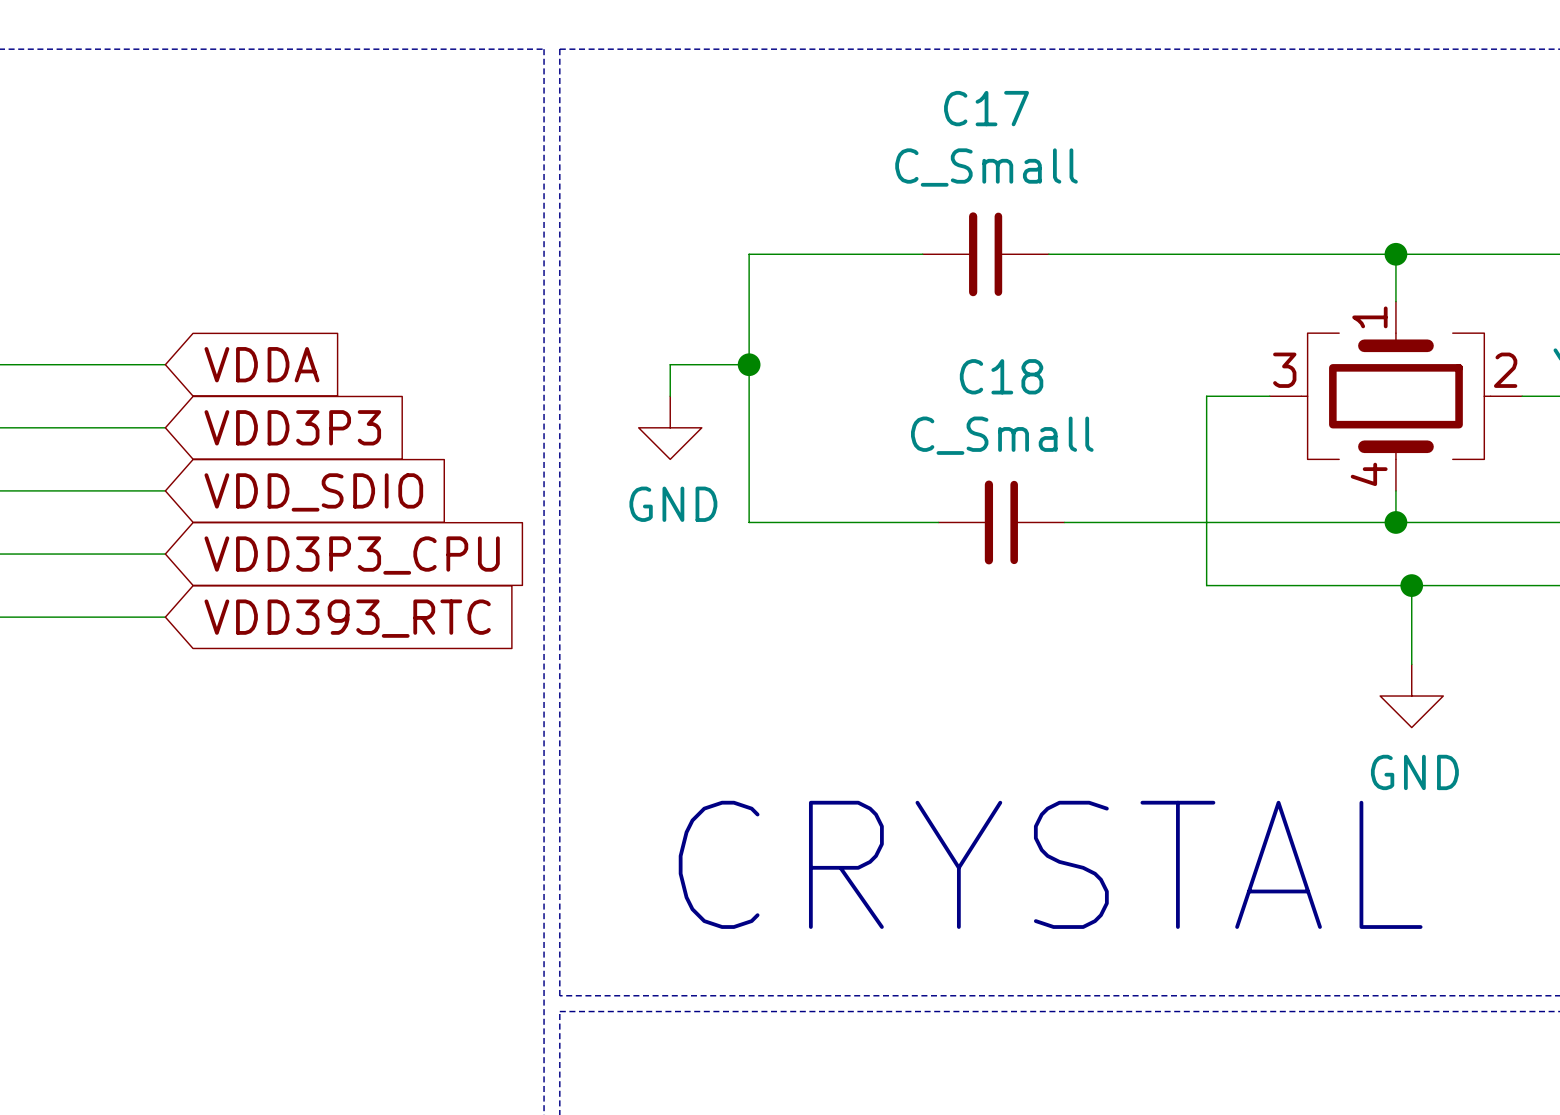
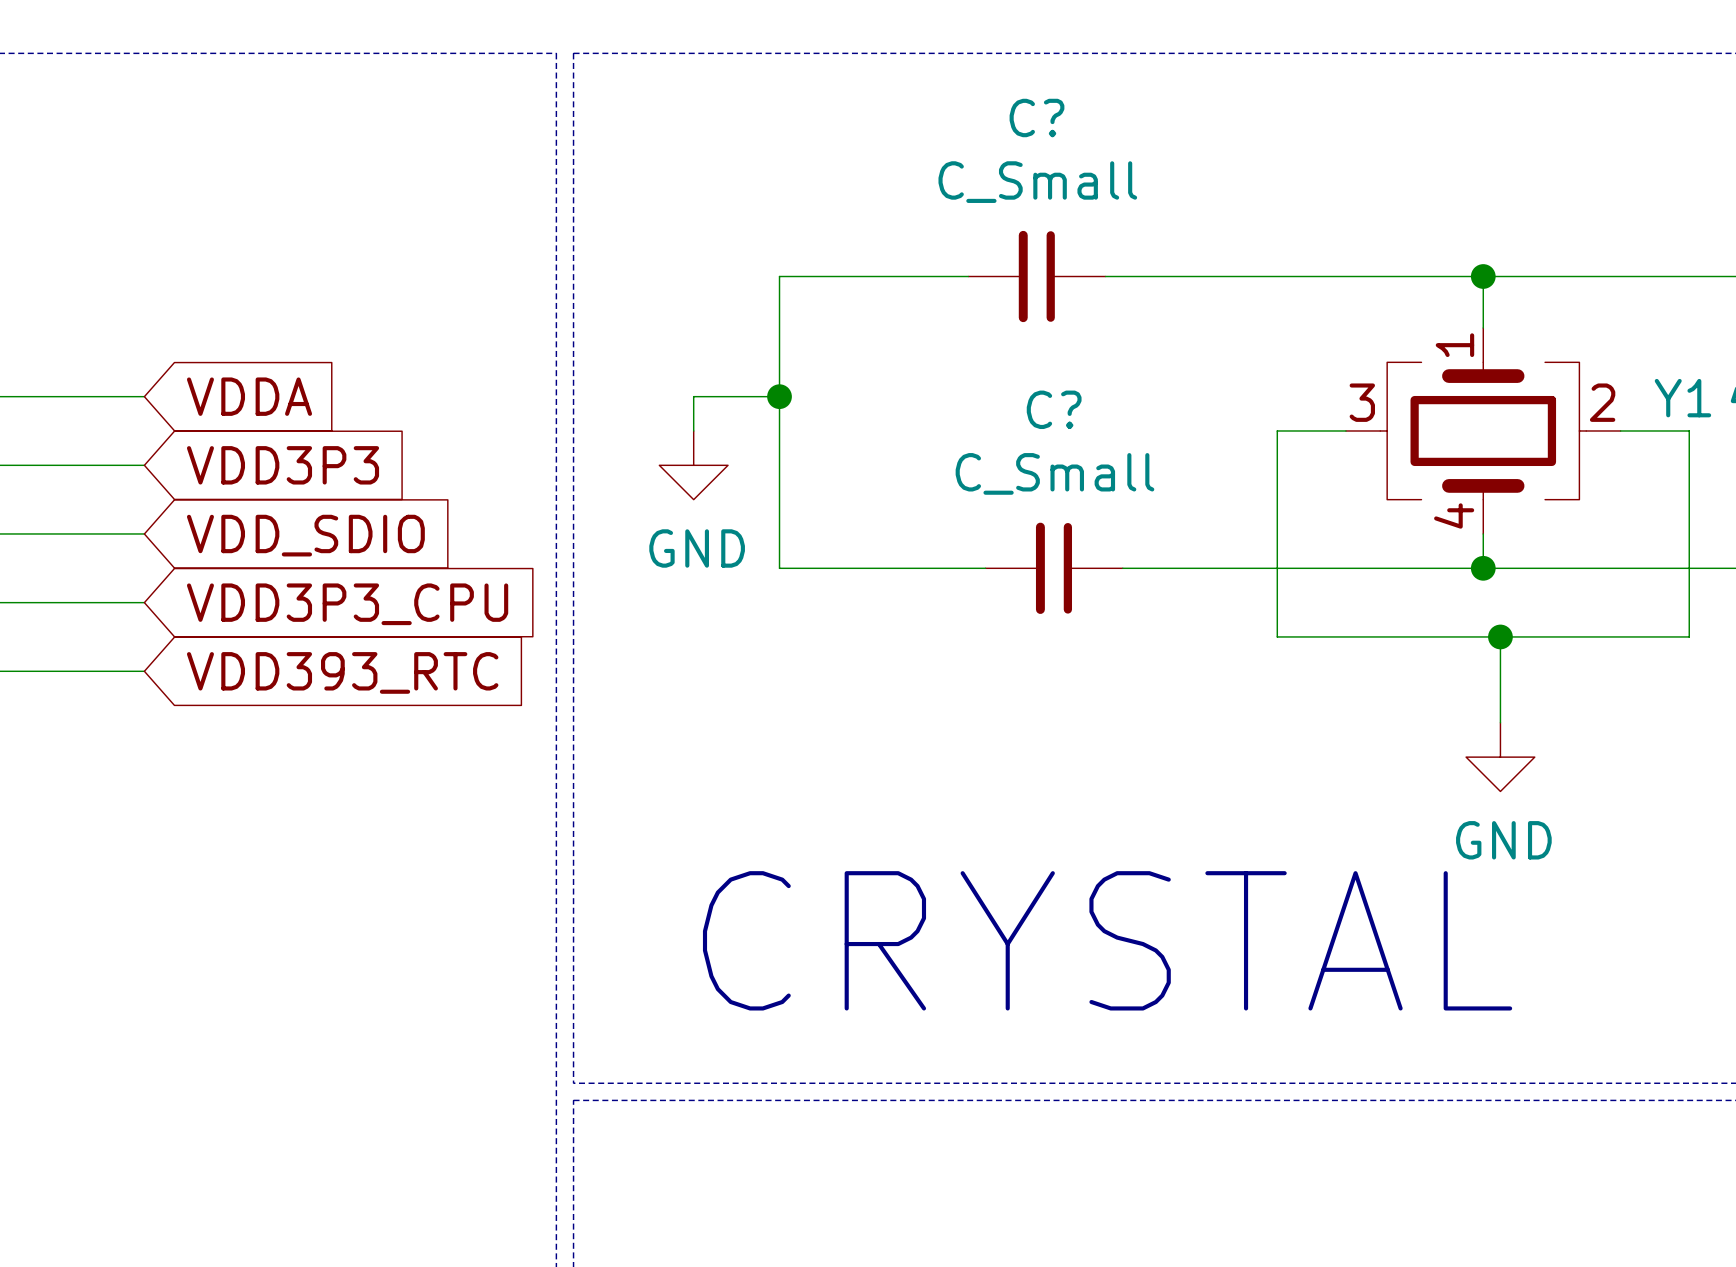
C17 name: C17 (986, 108) -> C? (1036, 117)
C18 name: C18 (1001, 376) -> C? (1054, 409)

